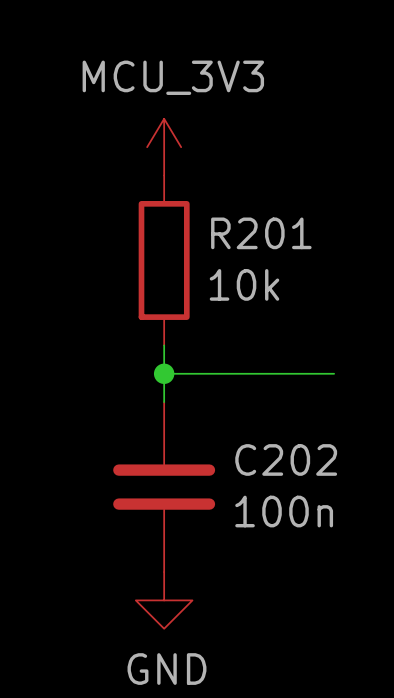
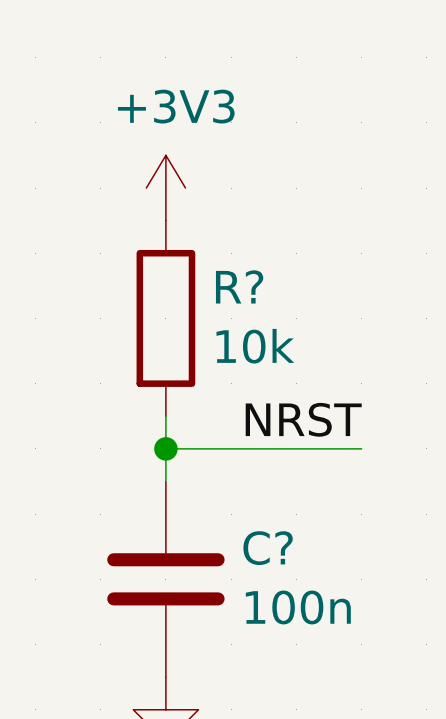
power symbol: MCU_3V3 (164, 147) -> +3V3 (165, 188)
R201 name: R201 (261, 233) -> R? (239, 286)
label: none -> NRST (303, 419)
C202 name: C202 (286, 459) -> C? (268, 548)

